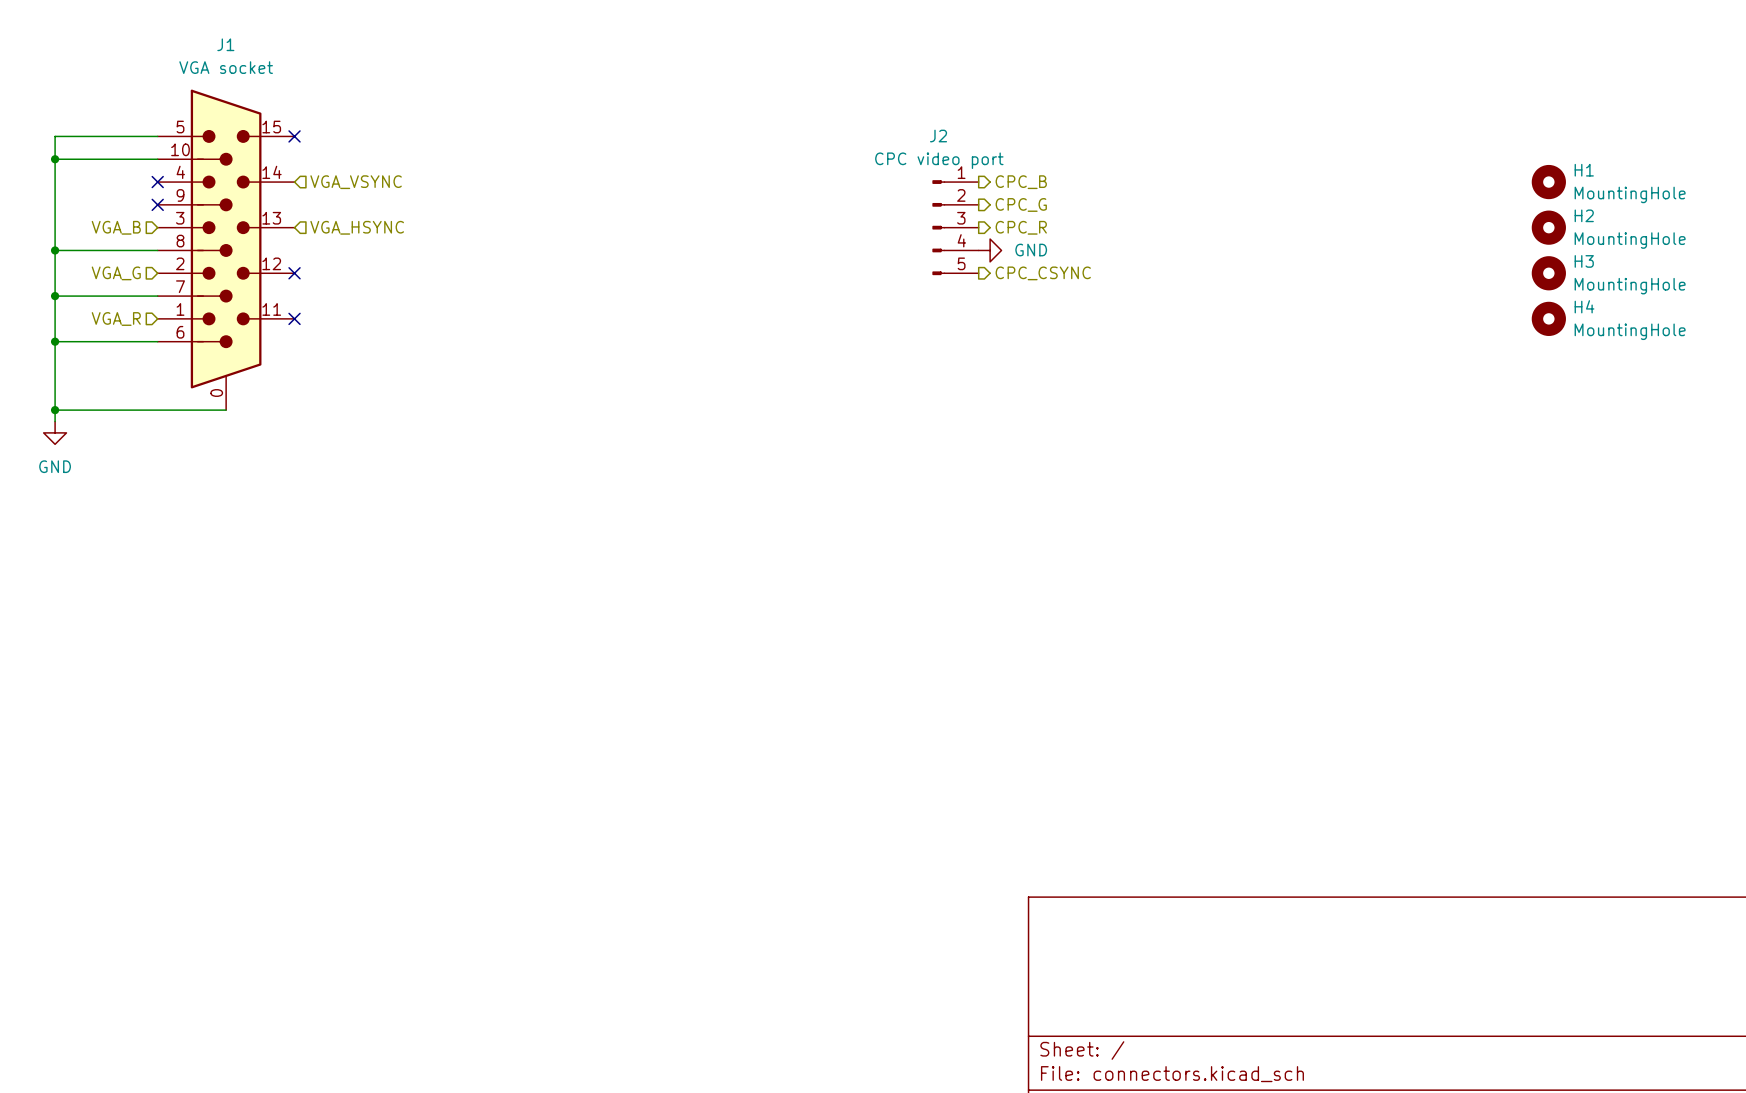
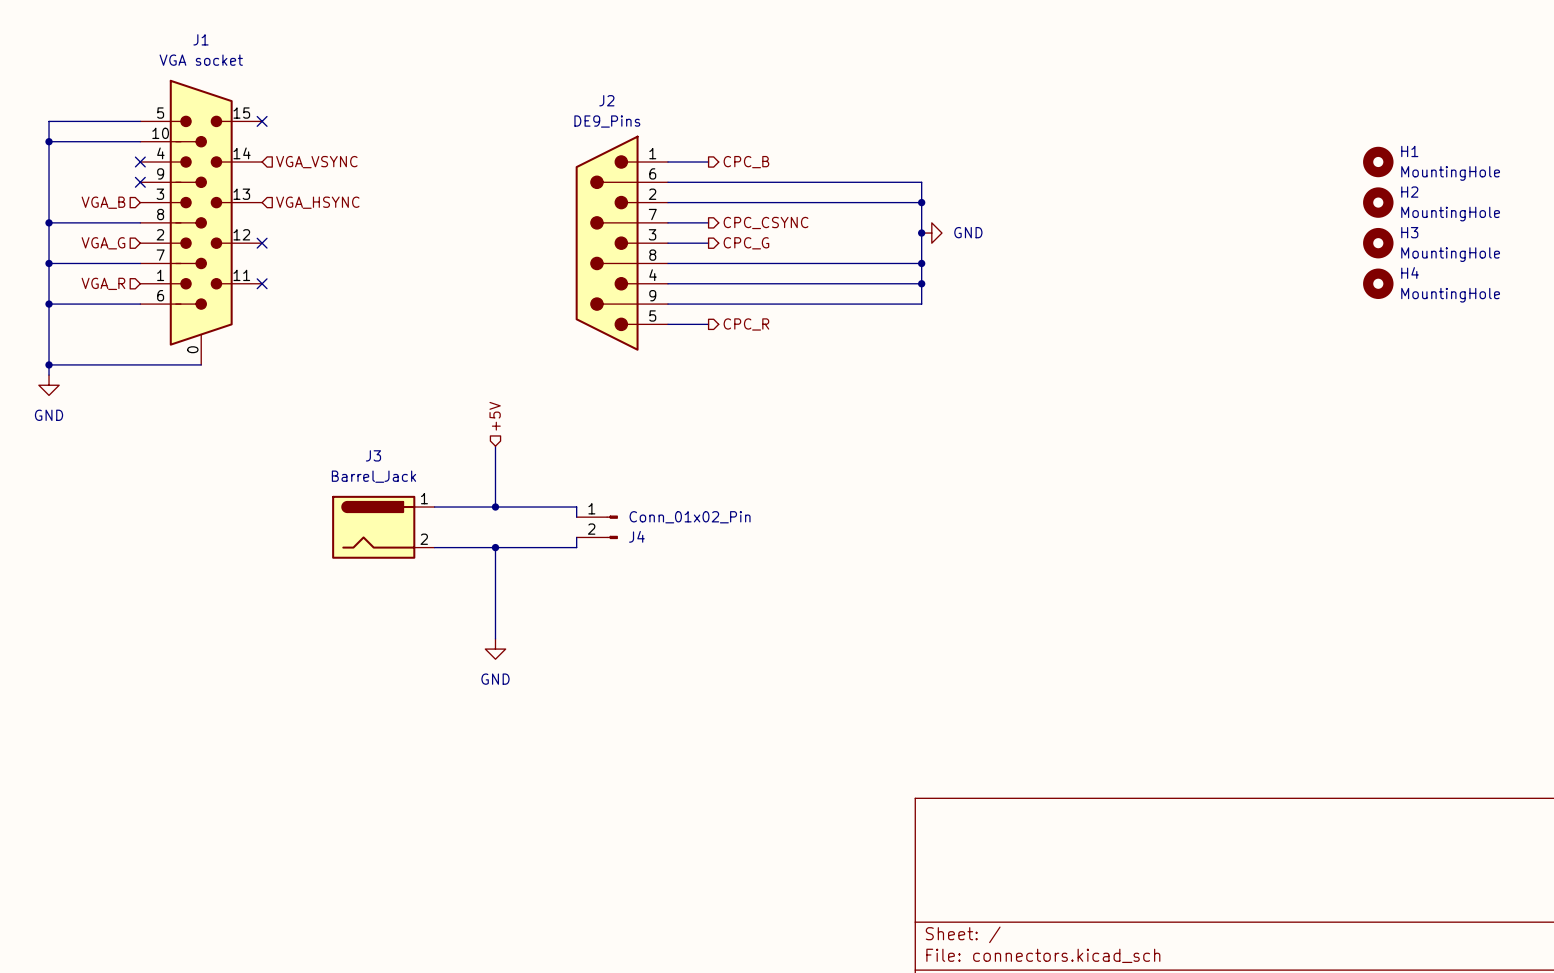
J2 name position: J2 (938, 136) -> J2 (606, 100)
J2 value: CPC video port (939, 160) -> DE9_Pins (607, 121)
J2 symbol: [932, 180, 979, 276] -> [575, 135, 668, 351]
wire: none -> (667, 162) (708, 162)
hierarchical label position: CPC_B (1021, 182) -> CPC_B (746, 162)
wire: none -> (667, 182) (921, 182) (921, 304) (667, 304)
hierarchical label position: CPC_G (1021, 204) -> CPC_G (746, 243)
wire: none -> (667, 202) (921, 202)
hierarchical label: CPC_R (1021, 227) -> none
junction: none -> (921, 202)
wire: none -> (667, 222) (708, 222)
power symbol position: GND (990, 250) -> GND (931, 233)
junction: none -> (921, 233)
wire: none -> (667, 243) (708, 243)
hierarchical label position: CPC_CSYNC (1043, 273) -> CPC_CSYNC (766, 222)
wire: none -> (667, 263) (921, 263)
junction: none -> (921, 263)
wire: none -> (667, 283) (921, 283)
junction: none -> (921, 283)
wire: none -> (667, 324) (708, 324)
hierarchical label: none -> CPC_R (746, 324)
hierarchical label: none -> +5V (495, 416)
wire: none -> (495, 446) (495, 507)
wire: none -> (434, 507) (576, 507) (576, 517)
junction: none -> (495, 507)
J3: none -> Barrel_Jack (383, 527)
J4: none -> Conn_01x02_Pin (597, 527)
wire: none -> (576, 537) (576, 547) (434, 547)
wire: none -> (495, 547) (495, 638)
junction: none -> (495, 547)
power symbol: none -> GND (495, 649)

